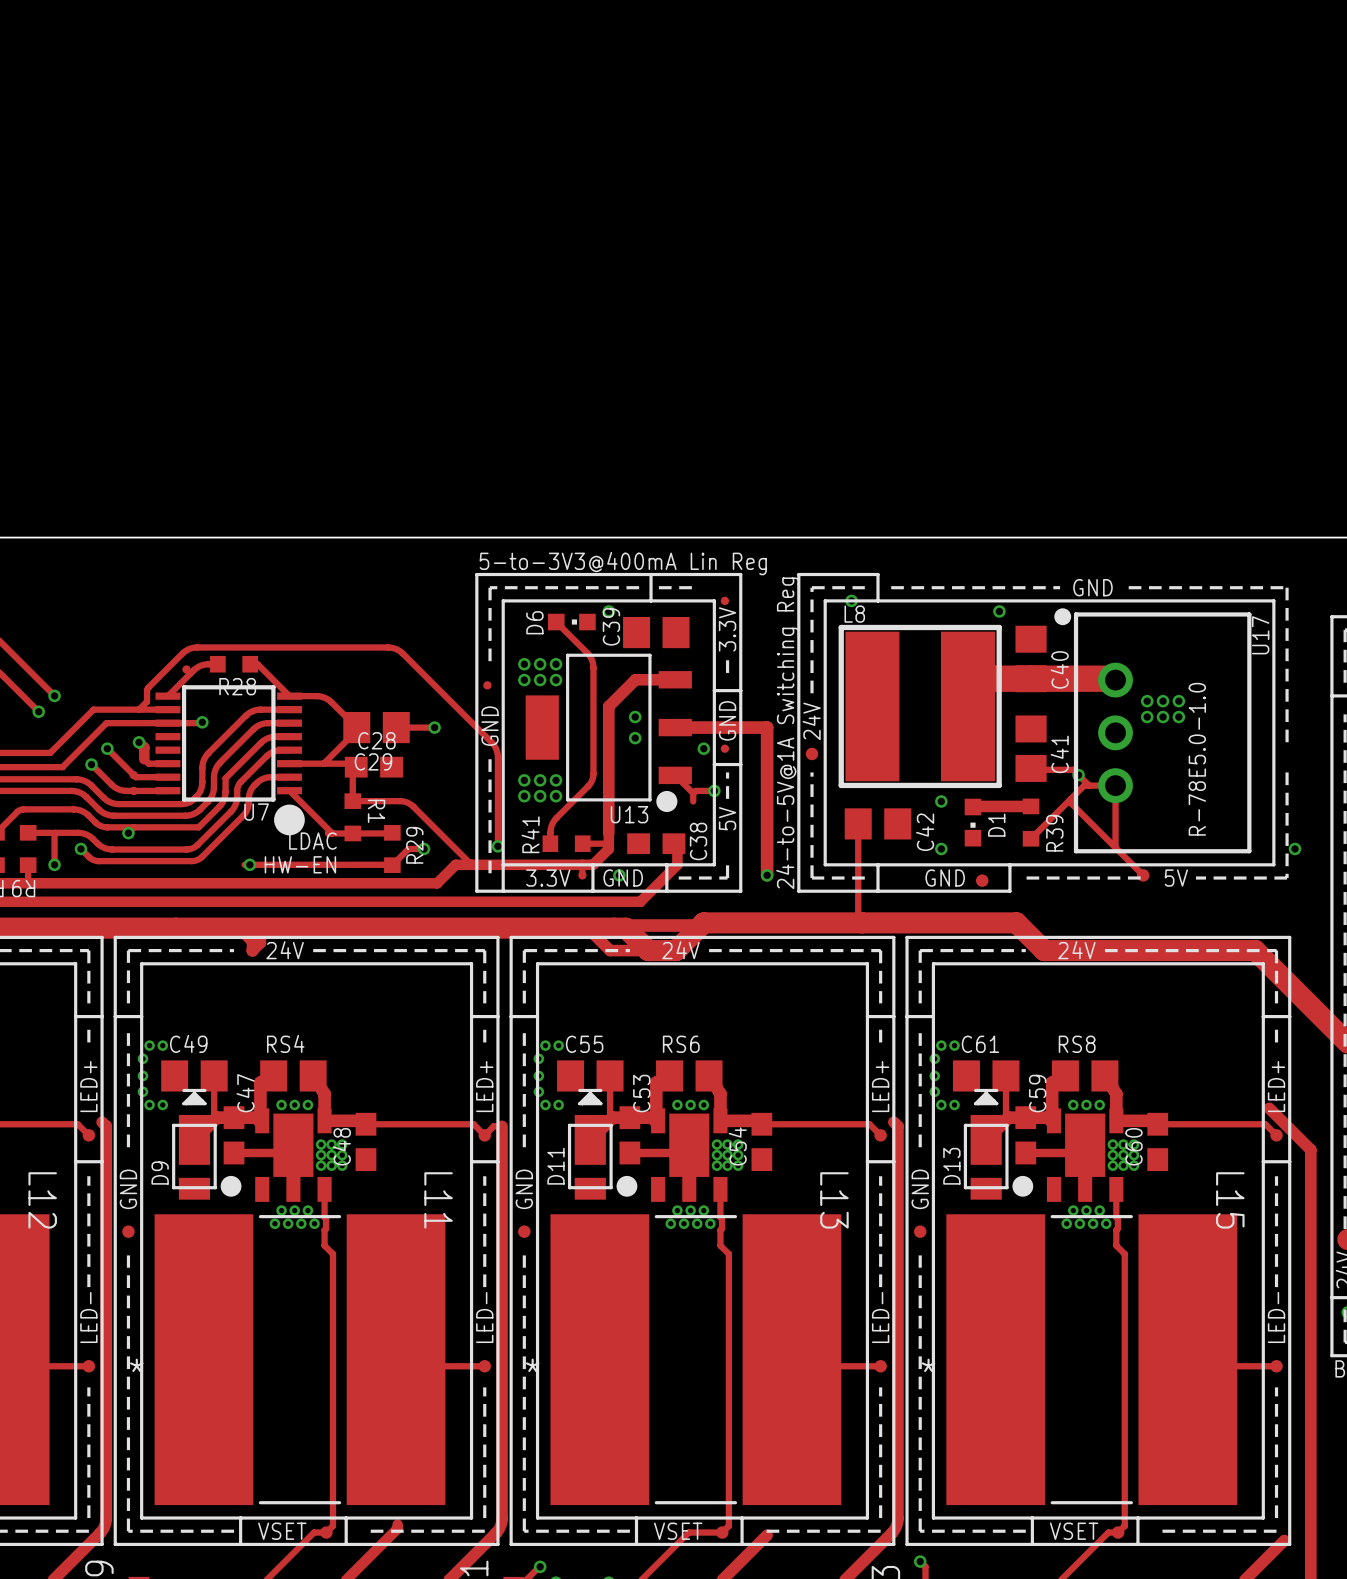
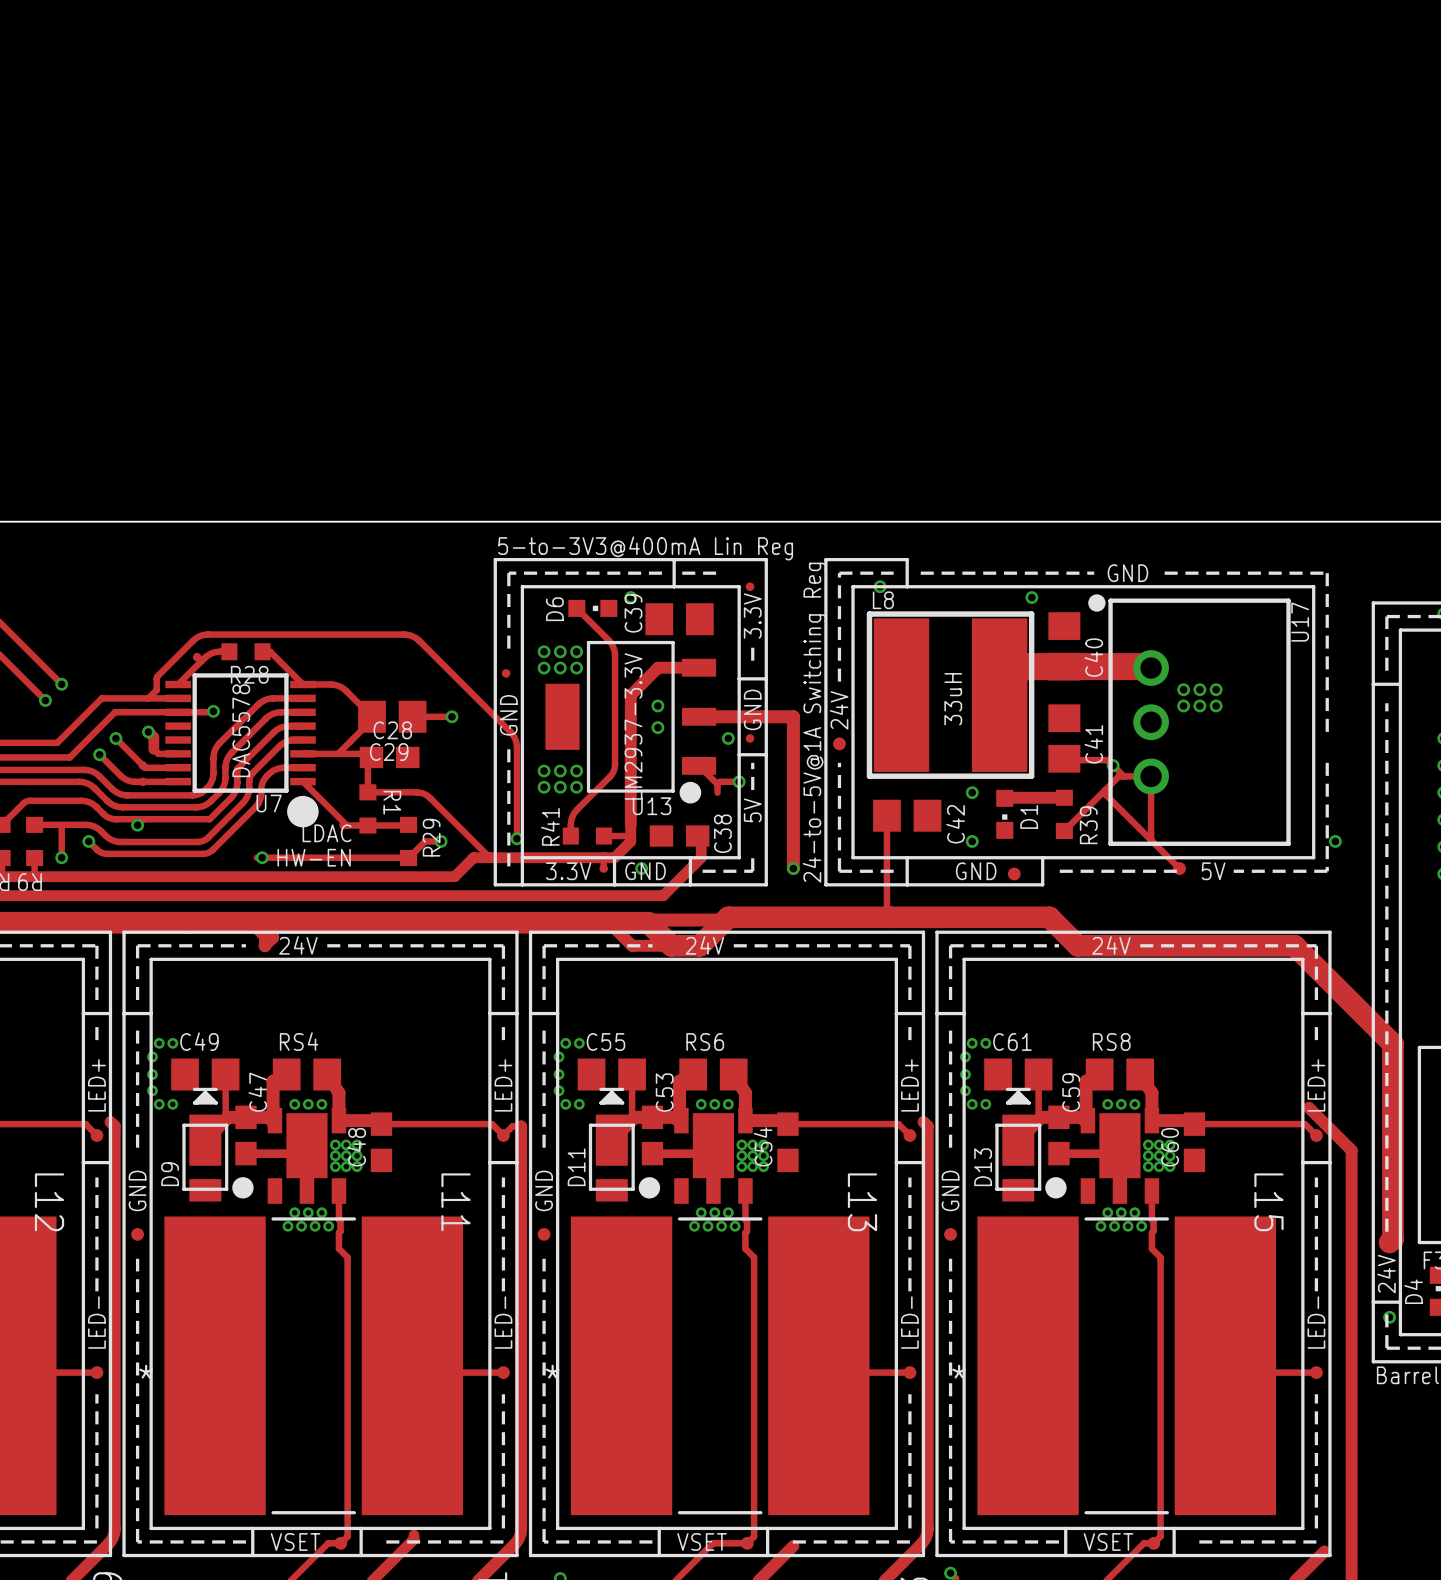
L8 value: none -> 33uH (953, 699)
U13 value: none -> LM2937-3.3V (633, 726)
U7 value: none -> DAC5578 (241, 730)
U17 value: R-78E5.0-1.0 (1197, 759) -> none

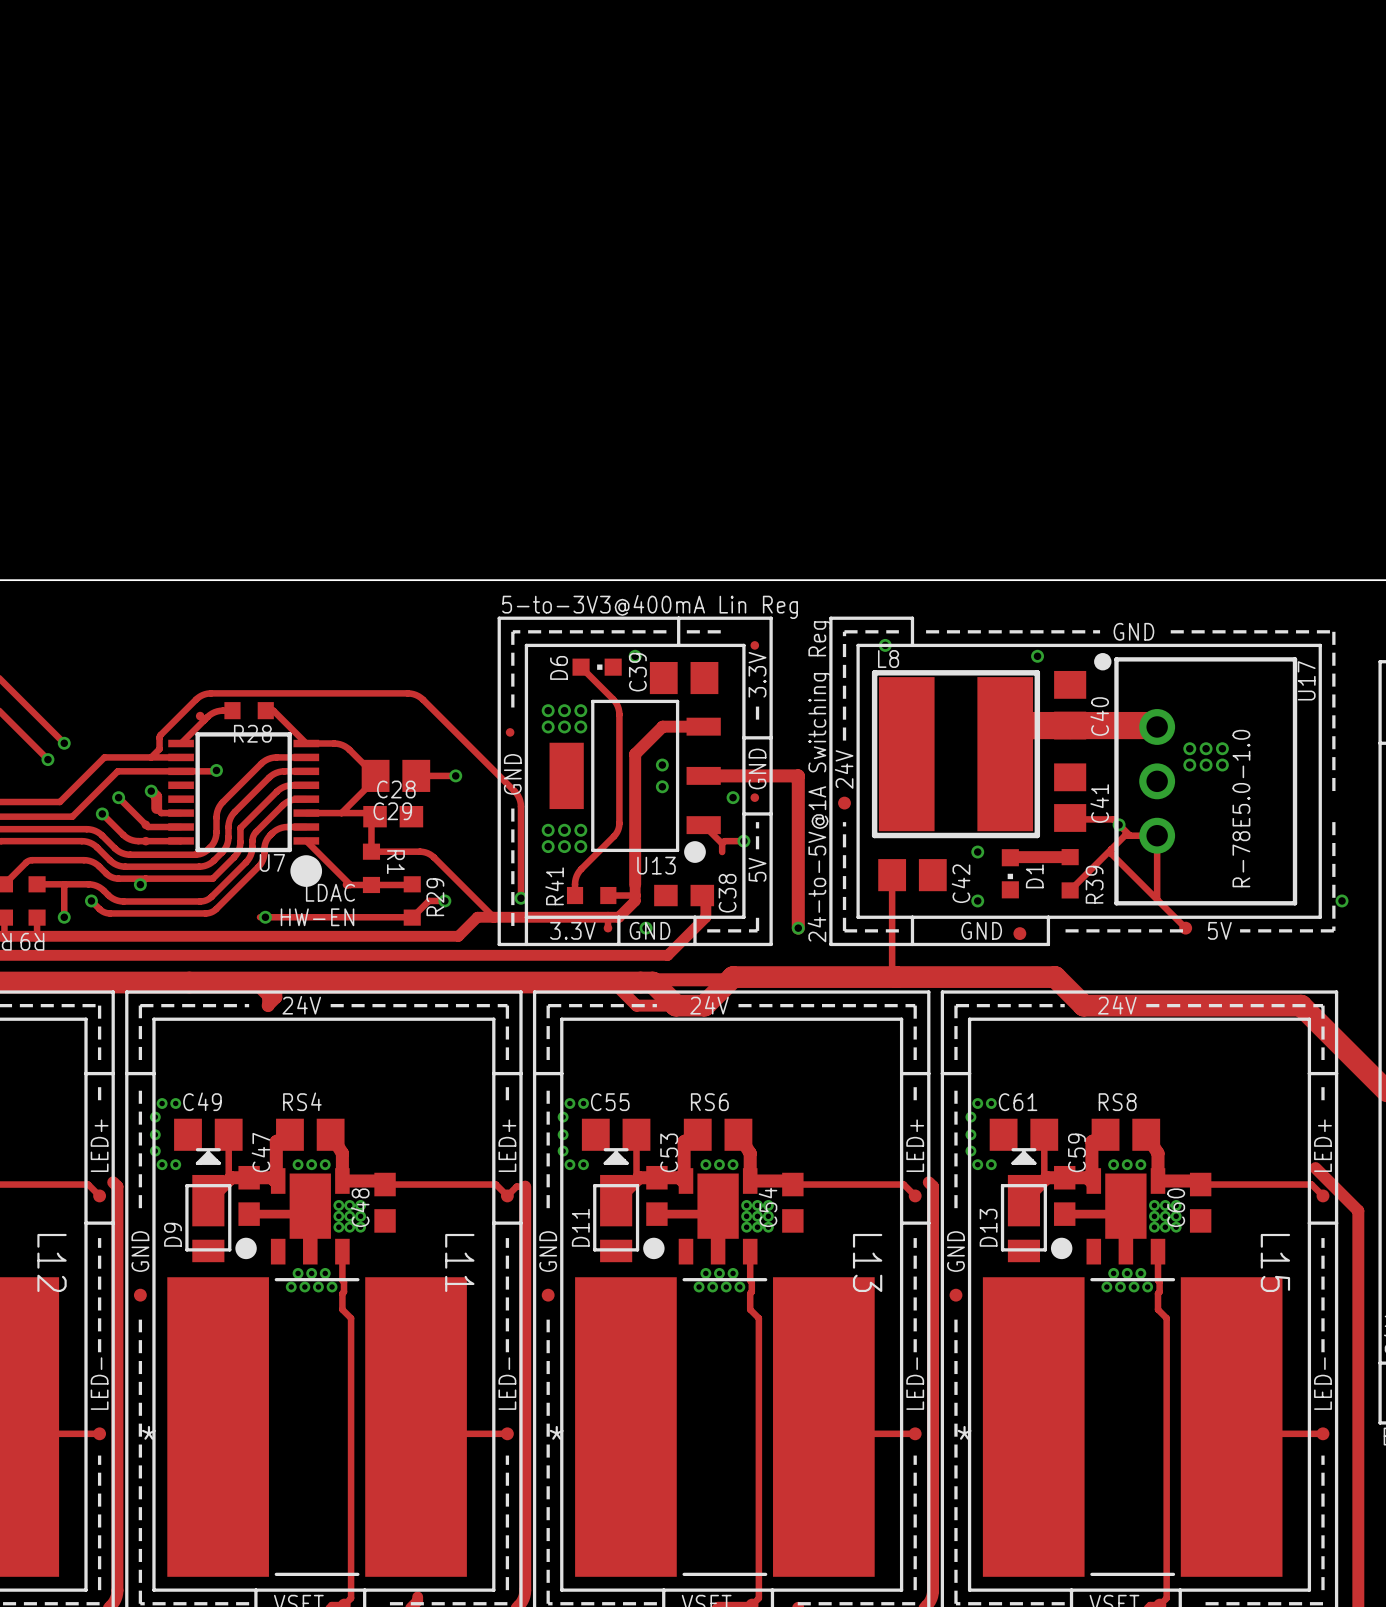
L8 value: 33uH (953, 699) -> none
U13 value: LM2937-3.3V (633, 726) -> none
U7 value: DAC5578 (241, 730) -> none
U17 value: none -> R-78E5.0-1.0 (1241, 808)

